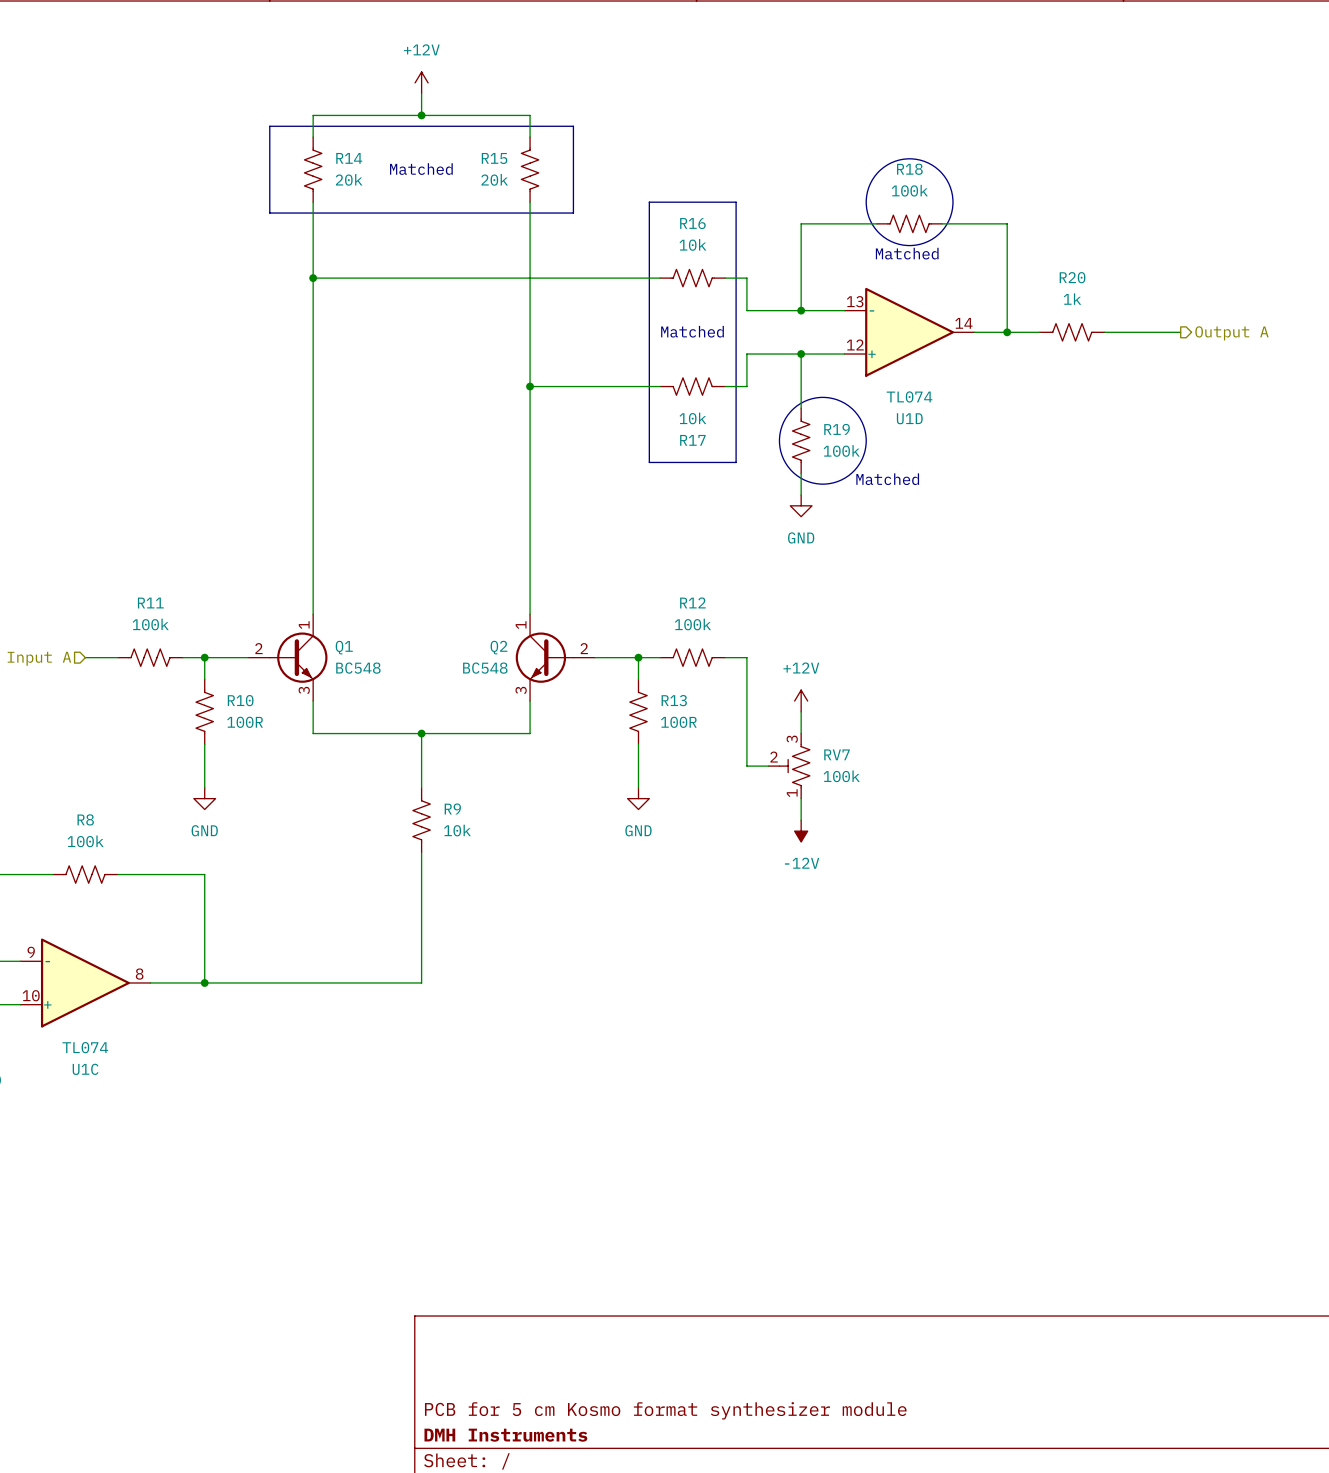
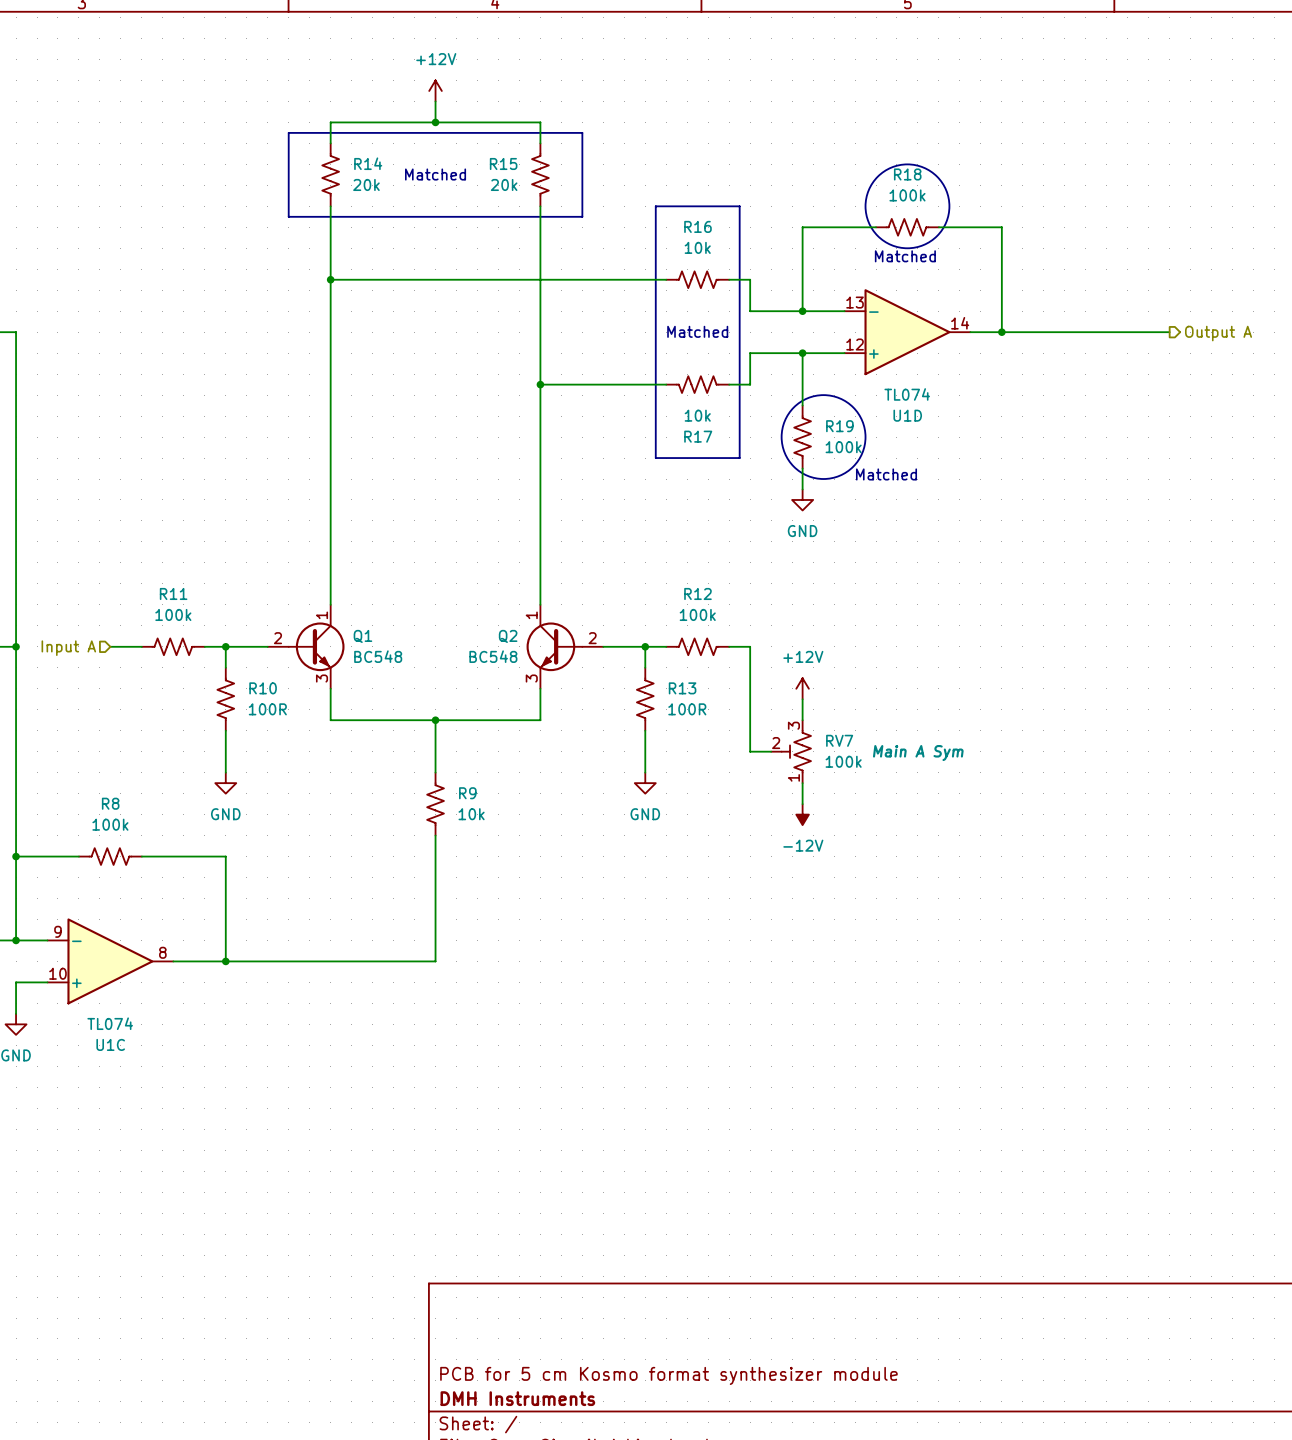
R20: 1k (1072, 332) -> none
RV7 text: none -> Main A Sym (918, 753)

